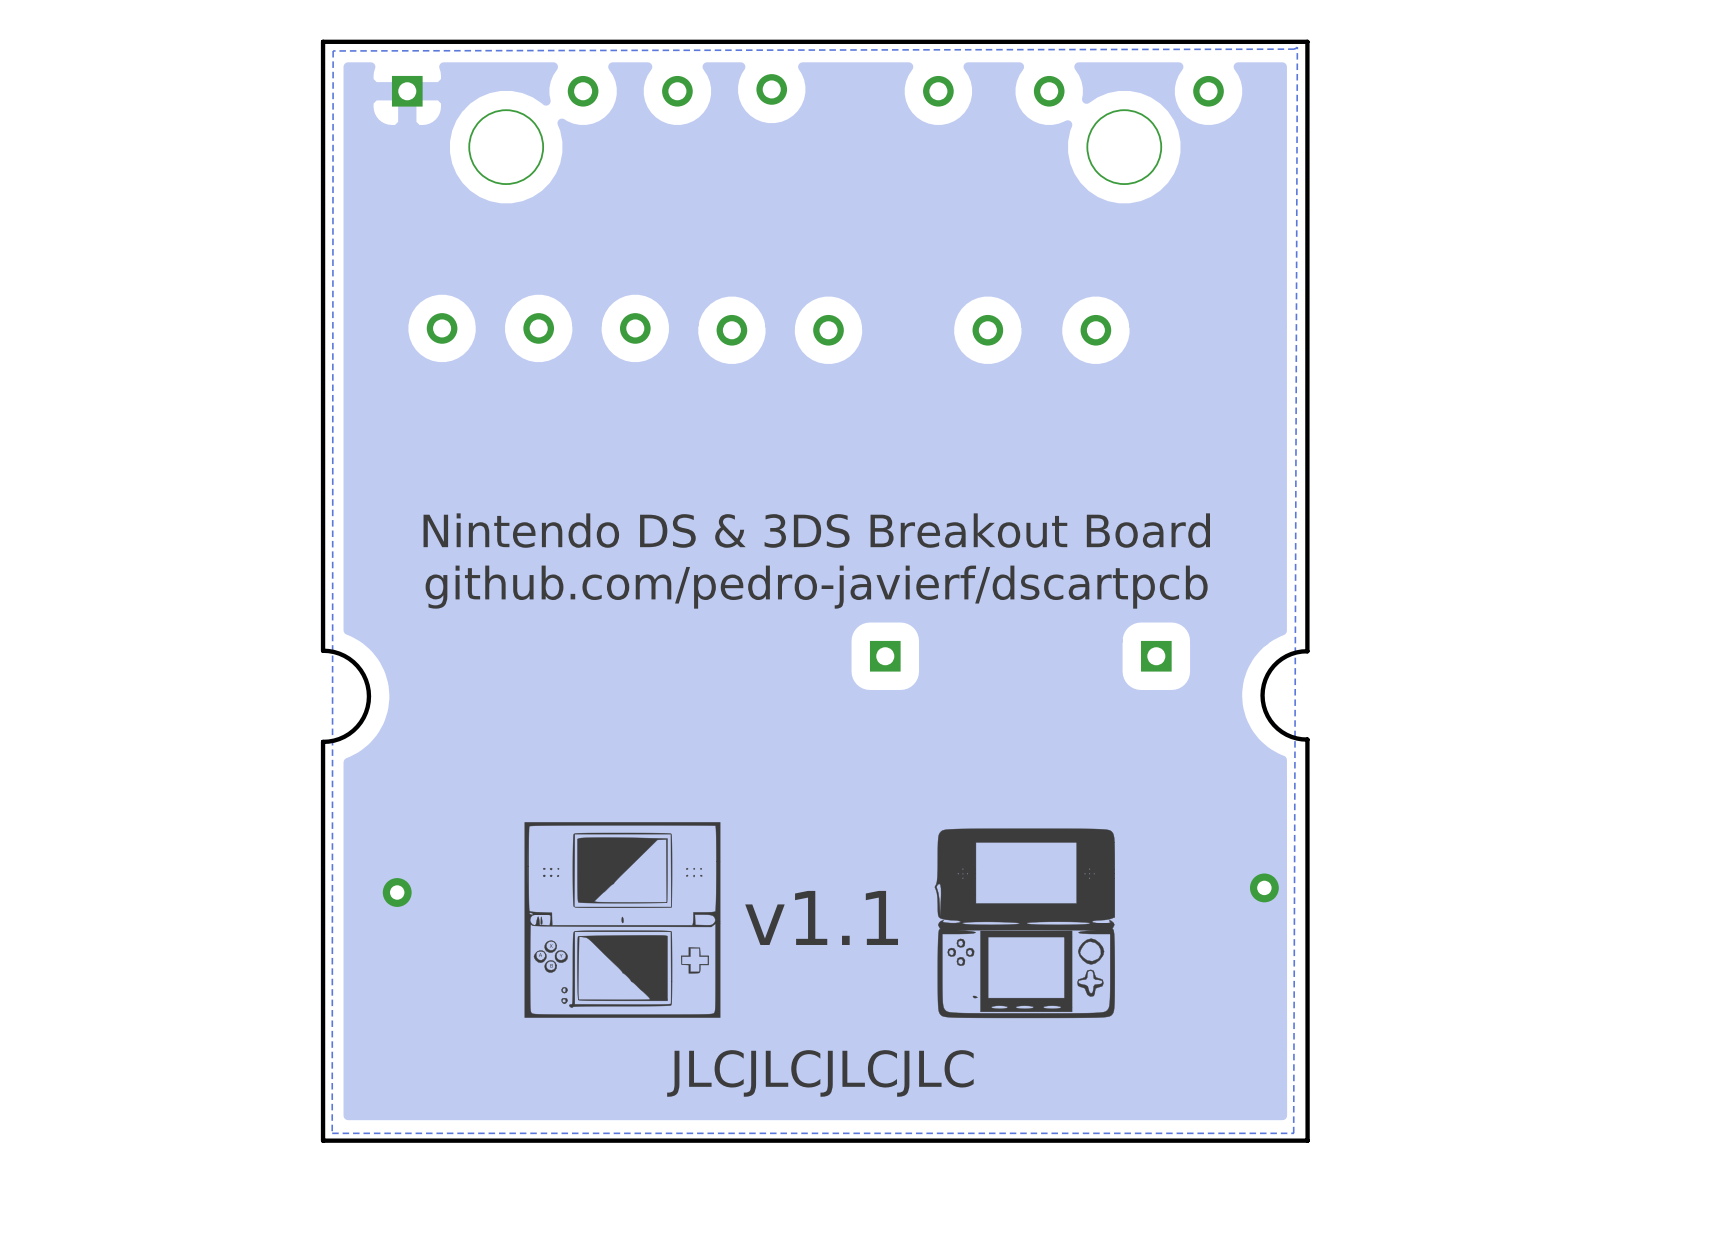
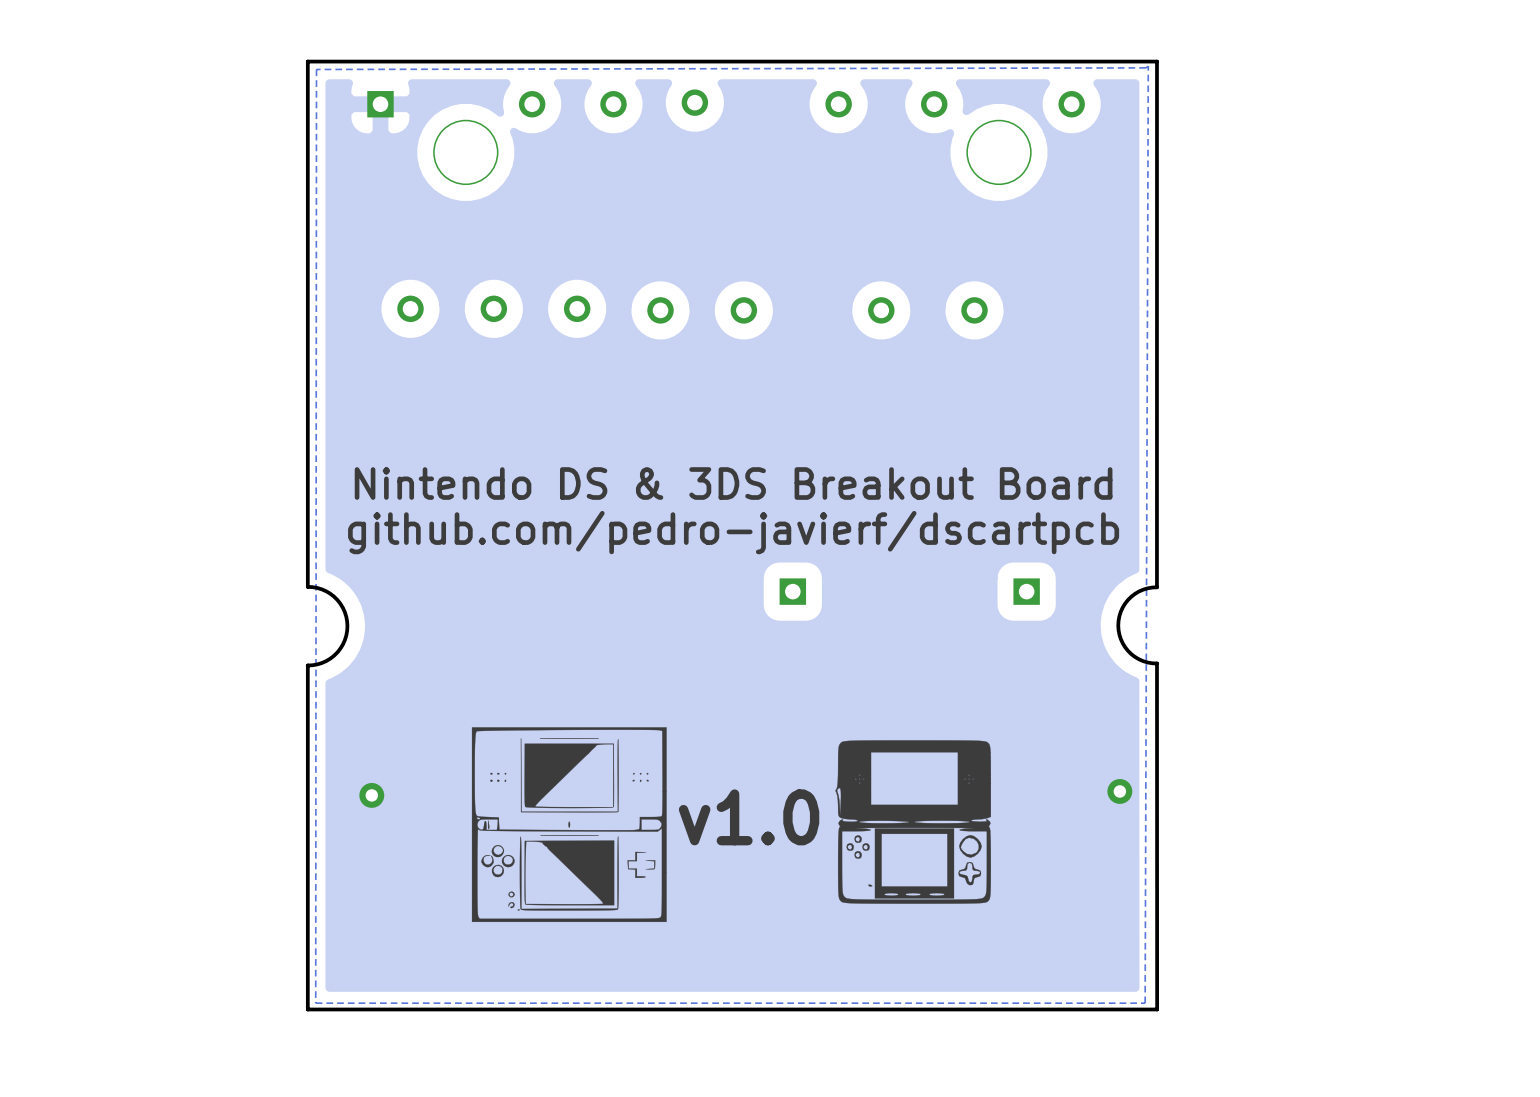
drawing shape: [524, 822, 721, 1018] -> [471, 727, 667, 923]
text: v1.1 (821, 917) -> v1.0 (749, 817)
text: JLCJLCJLCJLC (820, 1073) -> none

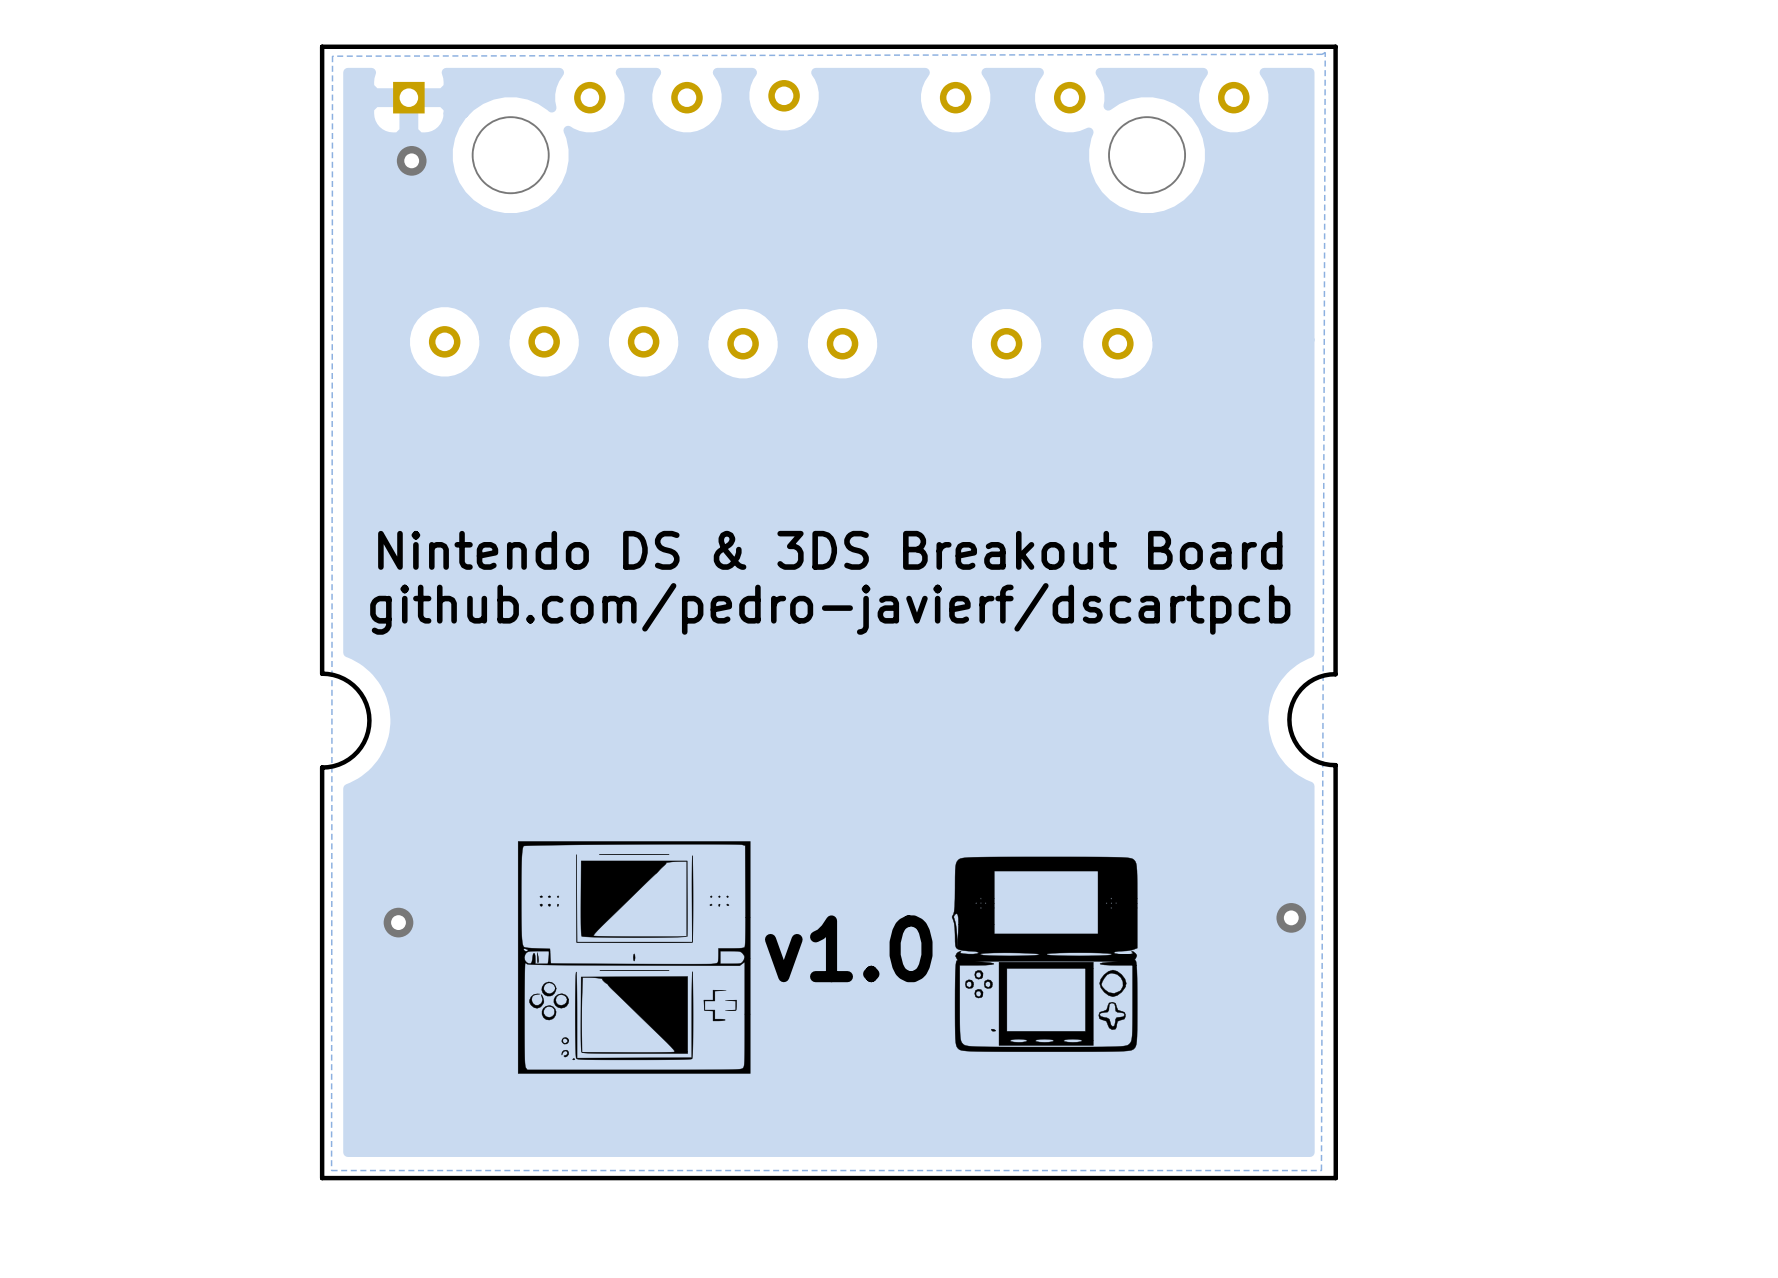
via: none -> (411, 160)
part: (792, 591) -> none
part: (1026, 591) -> none

